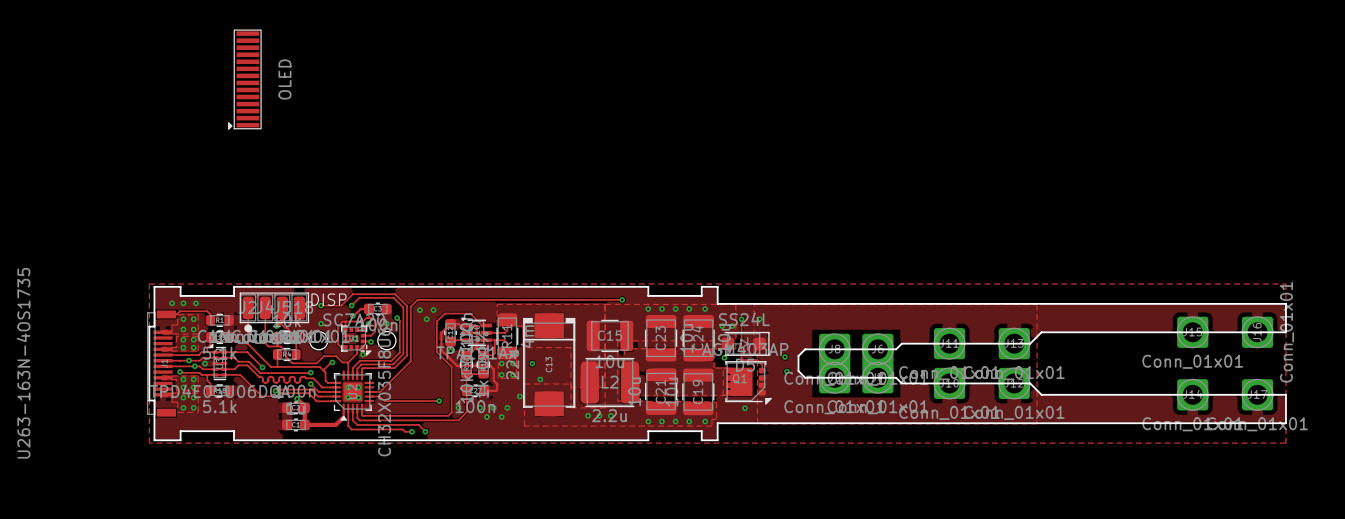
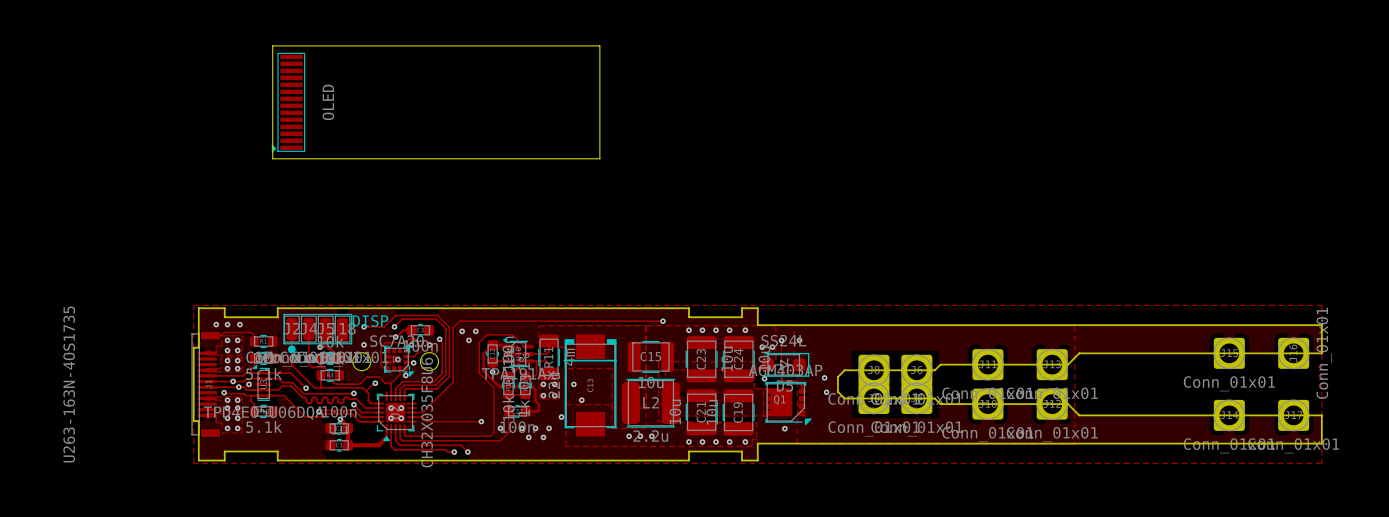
board edge: none -> (272, 45) (599, 45) (599, 158) (272, 158) (272, 45)

